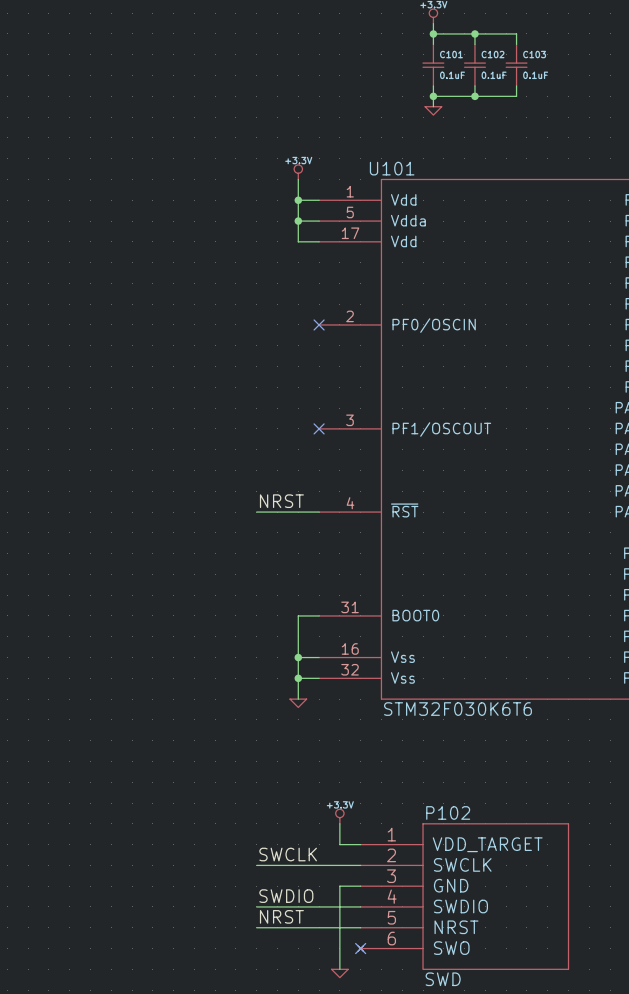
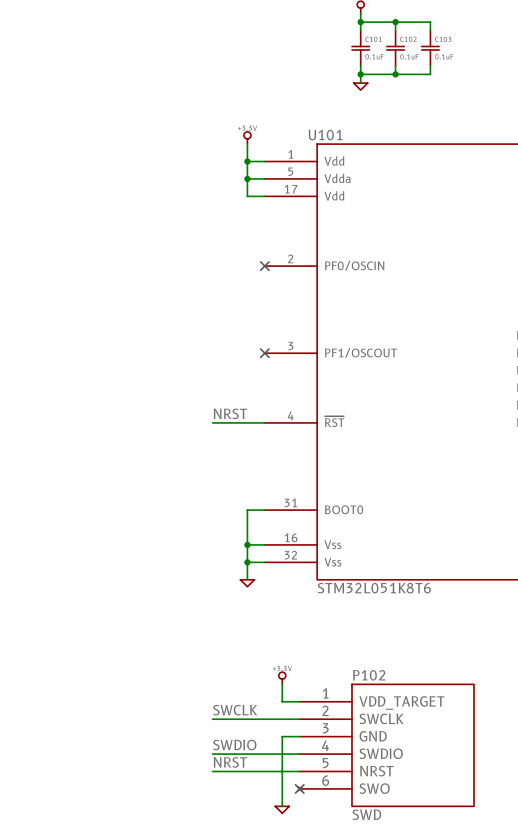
U101 value: STM32F030K6T6 (457, 709) -> STM32L051K8T6 (374, 588)

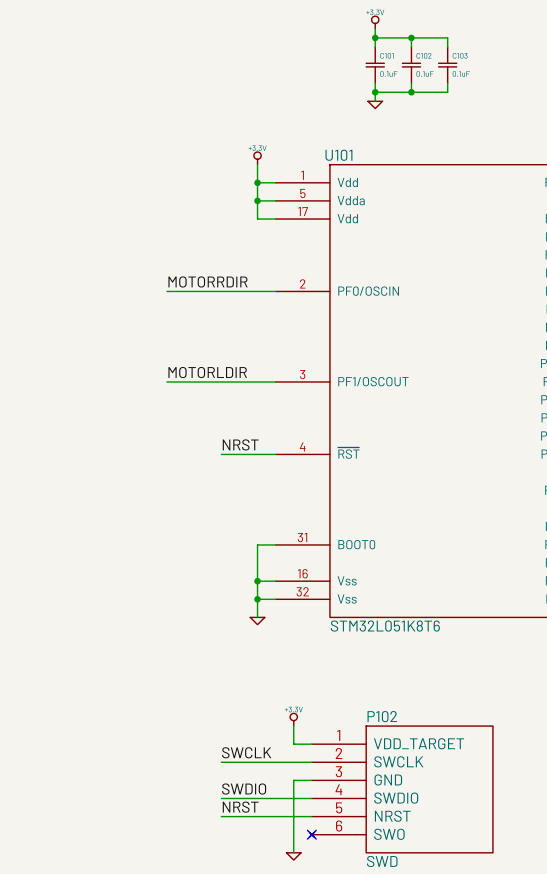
label: none -> MOTORRDIR (208, 281)
wire: none -> (166, 291) (275, 291)
no-connect mark: (264, 266) -> none
label: none -> MOTORLDIR (207, 372)
wire: none -> (166, 382) (275, 382)
no-connect mark: (264, 353) -> none

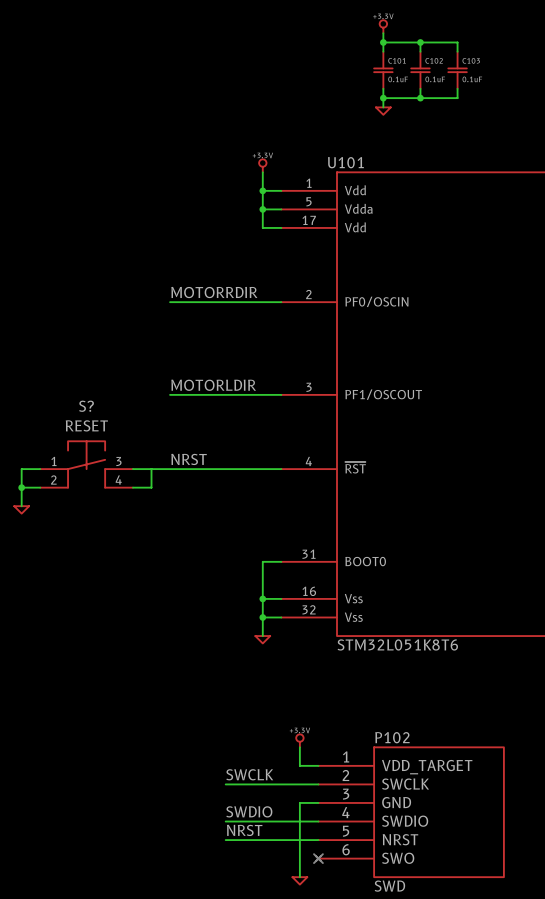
label position: NRST (240, 444) -> NRST (189, 459)
S?: none -> RESET (86, 464)
wire: none -> (40, 469) (21, 469) (21, 506)
wire: none -> (132, 469) (225, 469)
wire: none -> (151, 469) (151, 487) (132, 487)
wire: none -> (21, 487) (40, 487)
junction: none -> (21, 487)
power symbol: none -> (21, 509)

